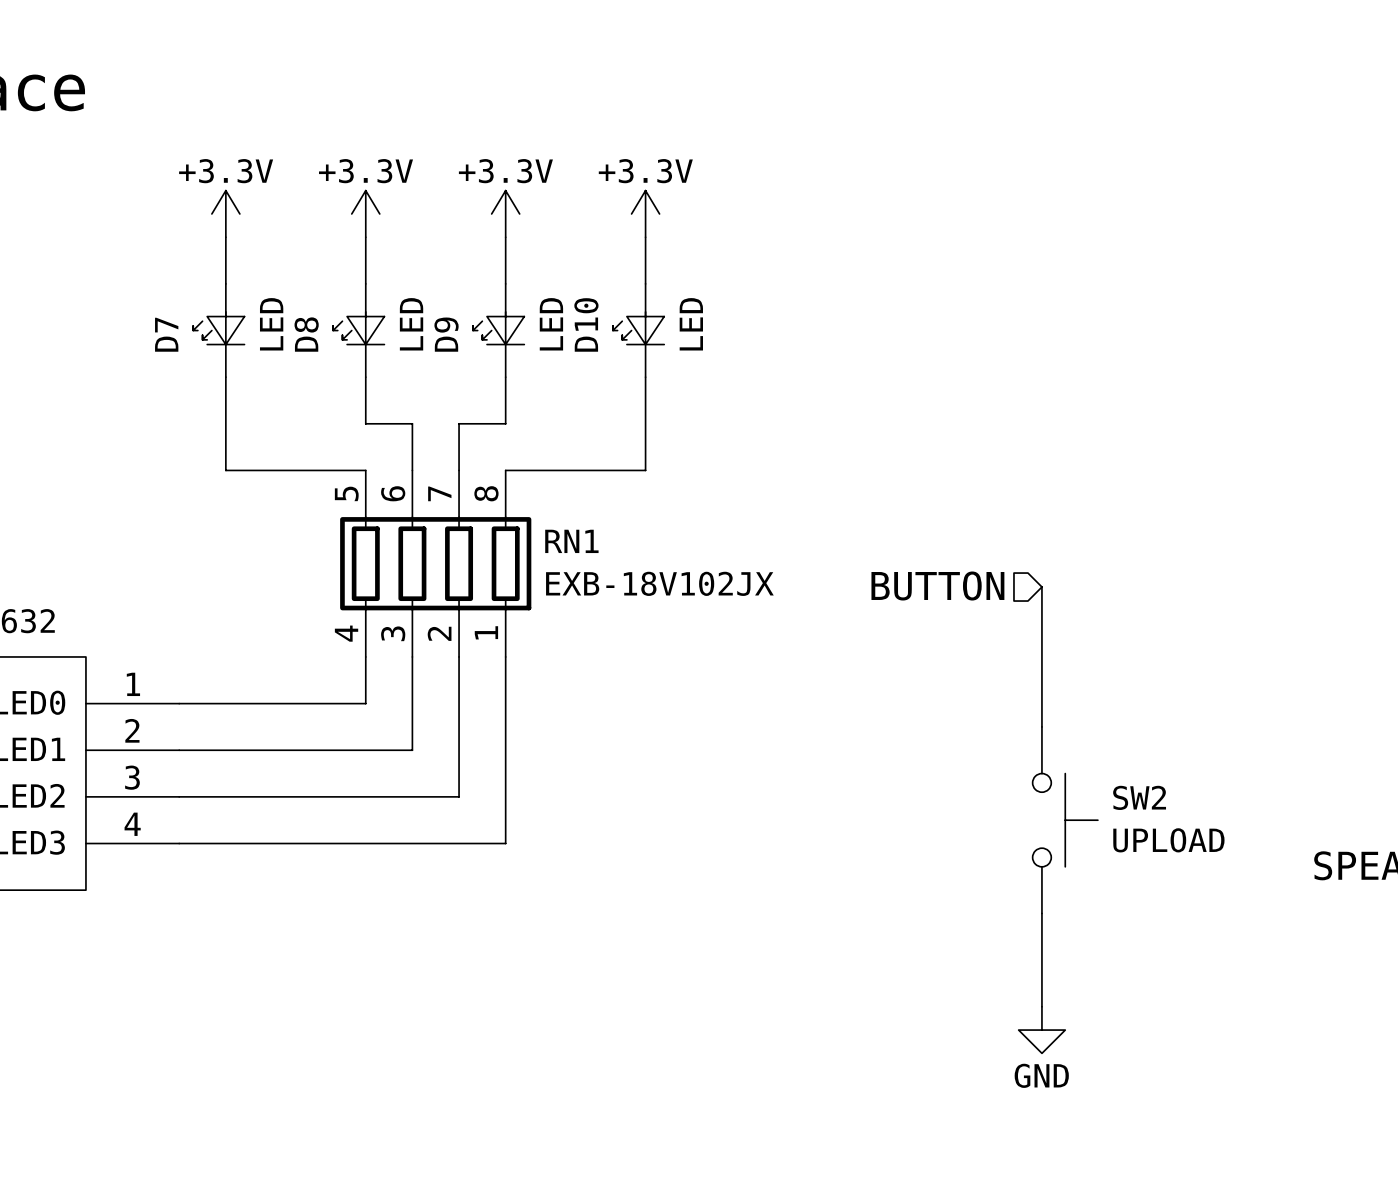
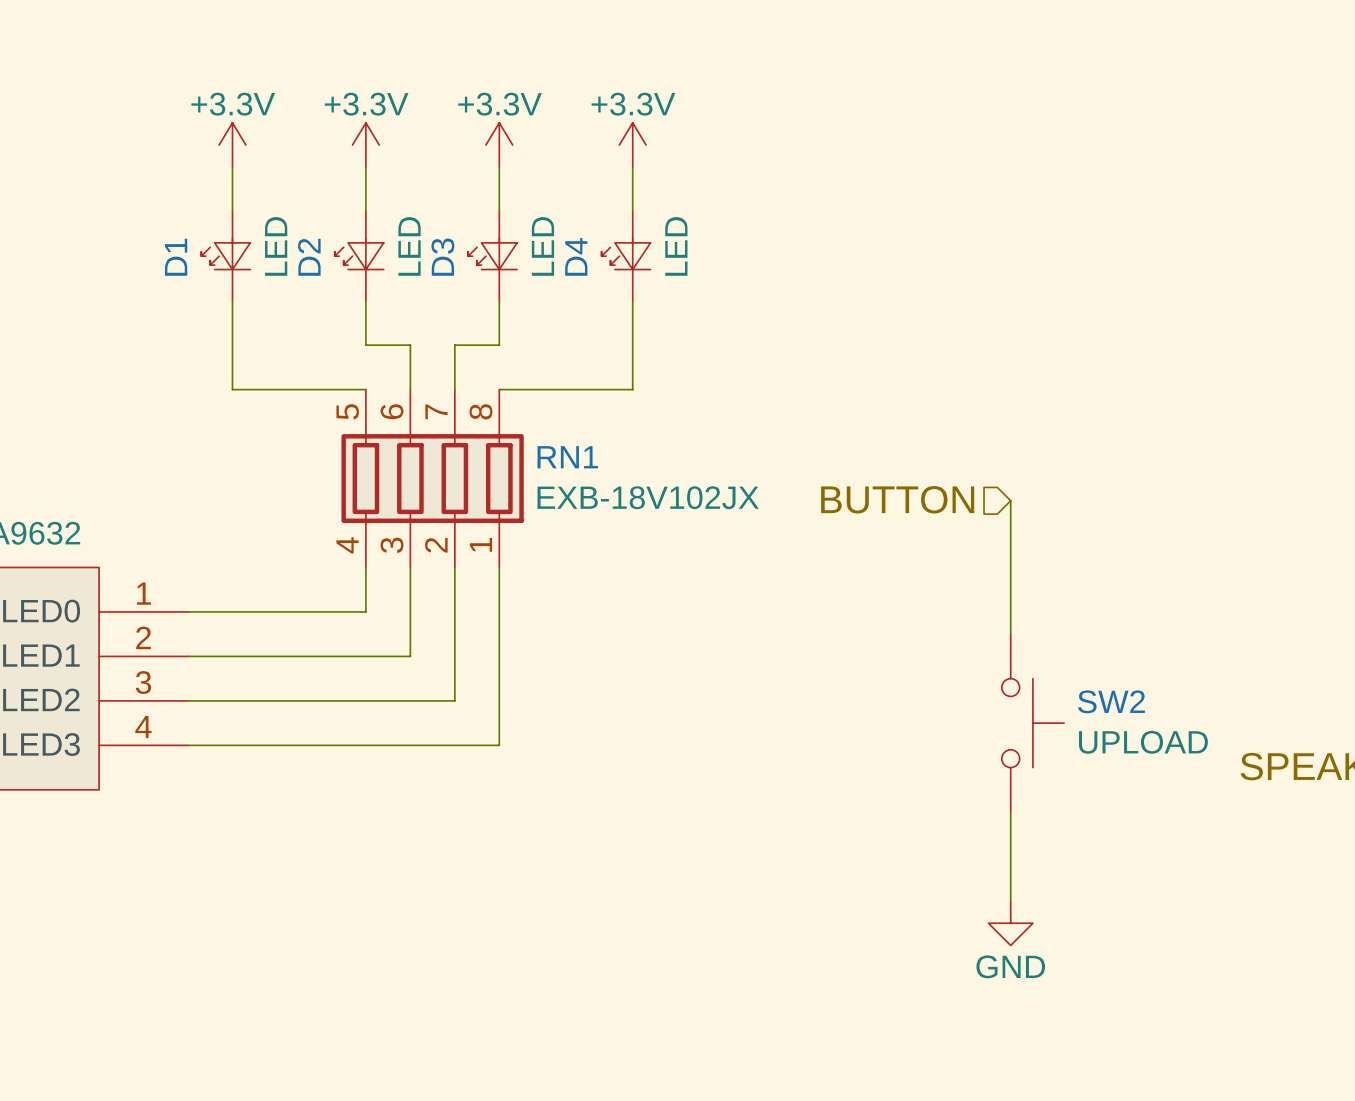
D10 name: D10 (586, 324) -> D4 (576, 256)
D7 name: D7 (166, 334) -> D1 (176, 257)
D8 name: D8 (306, 334) -> D2 (309, 257)
D9 name: D9 (446, 334) -> D3 (442, 257)

